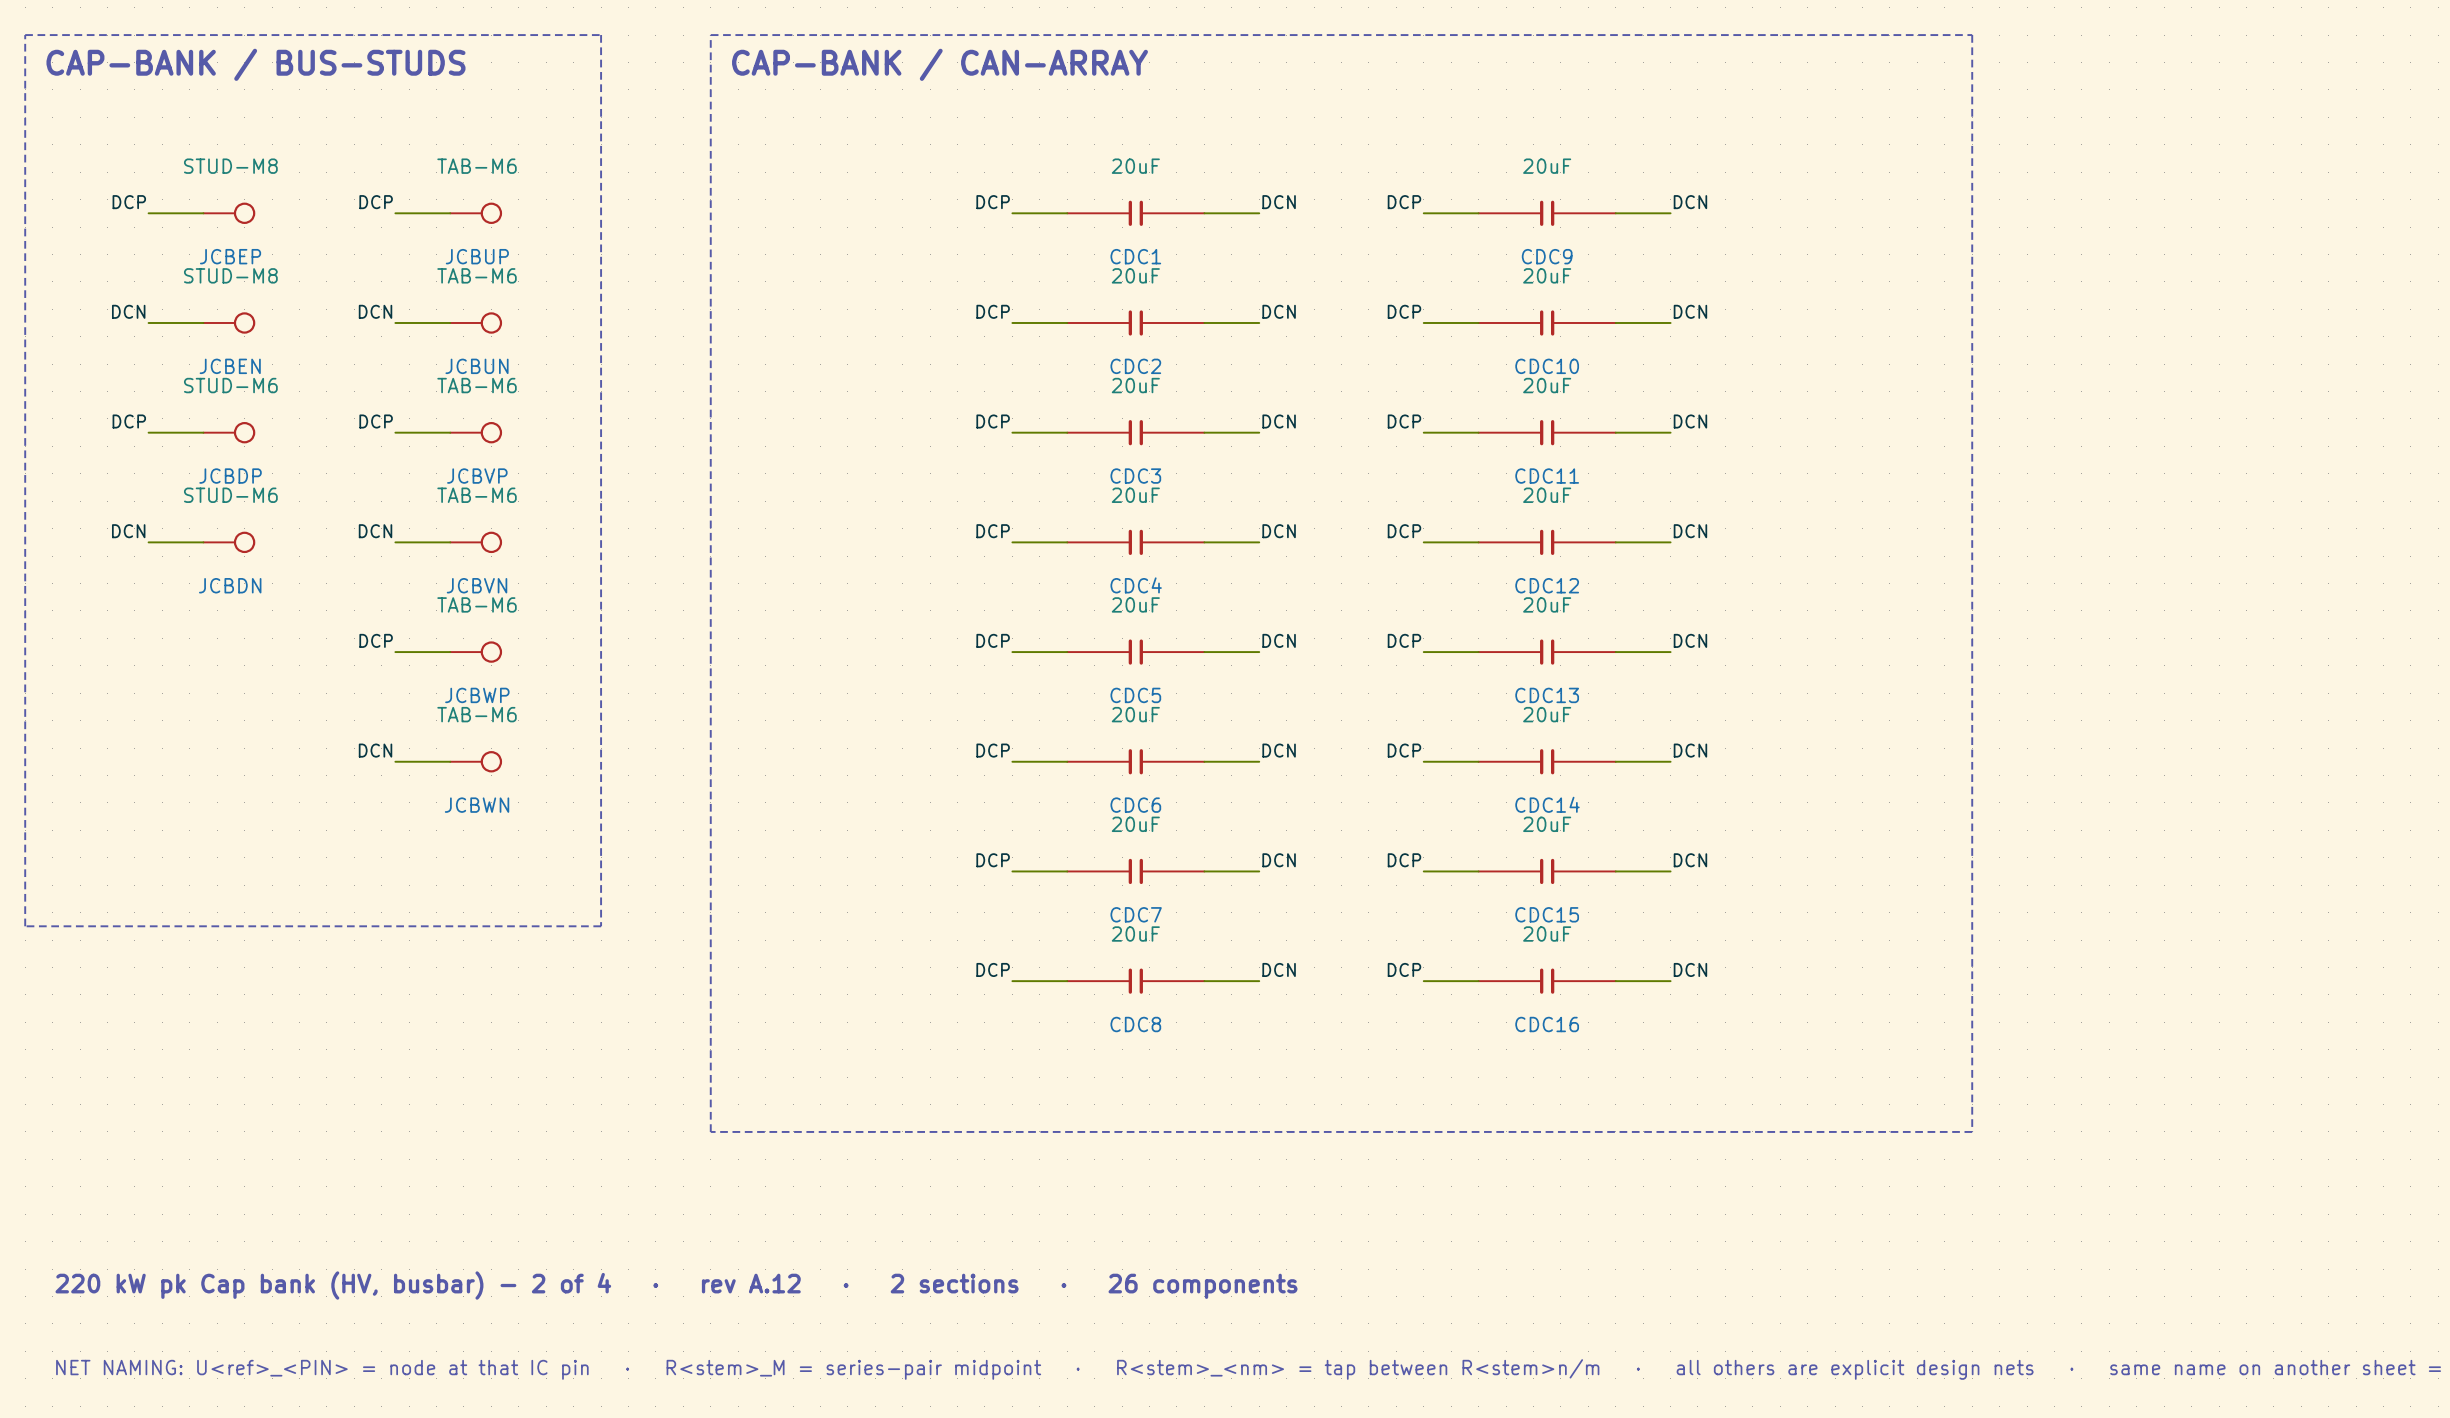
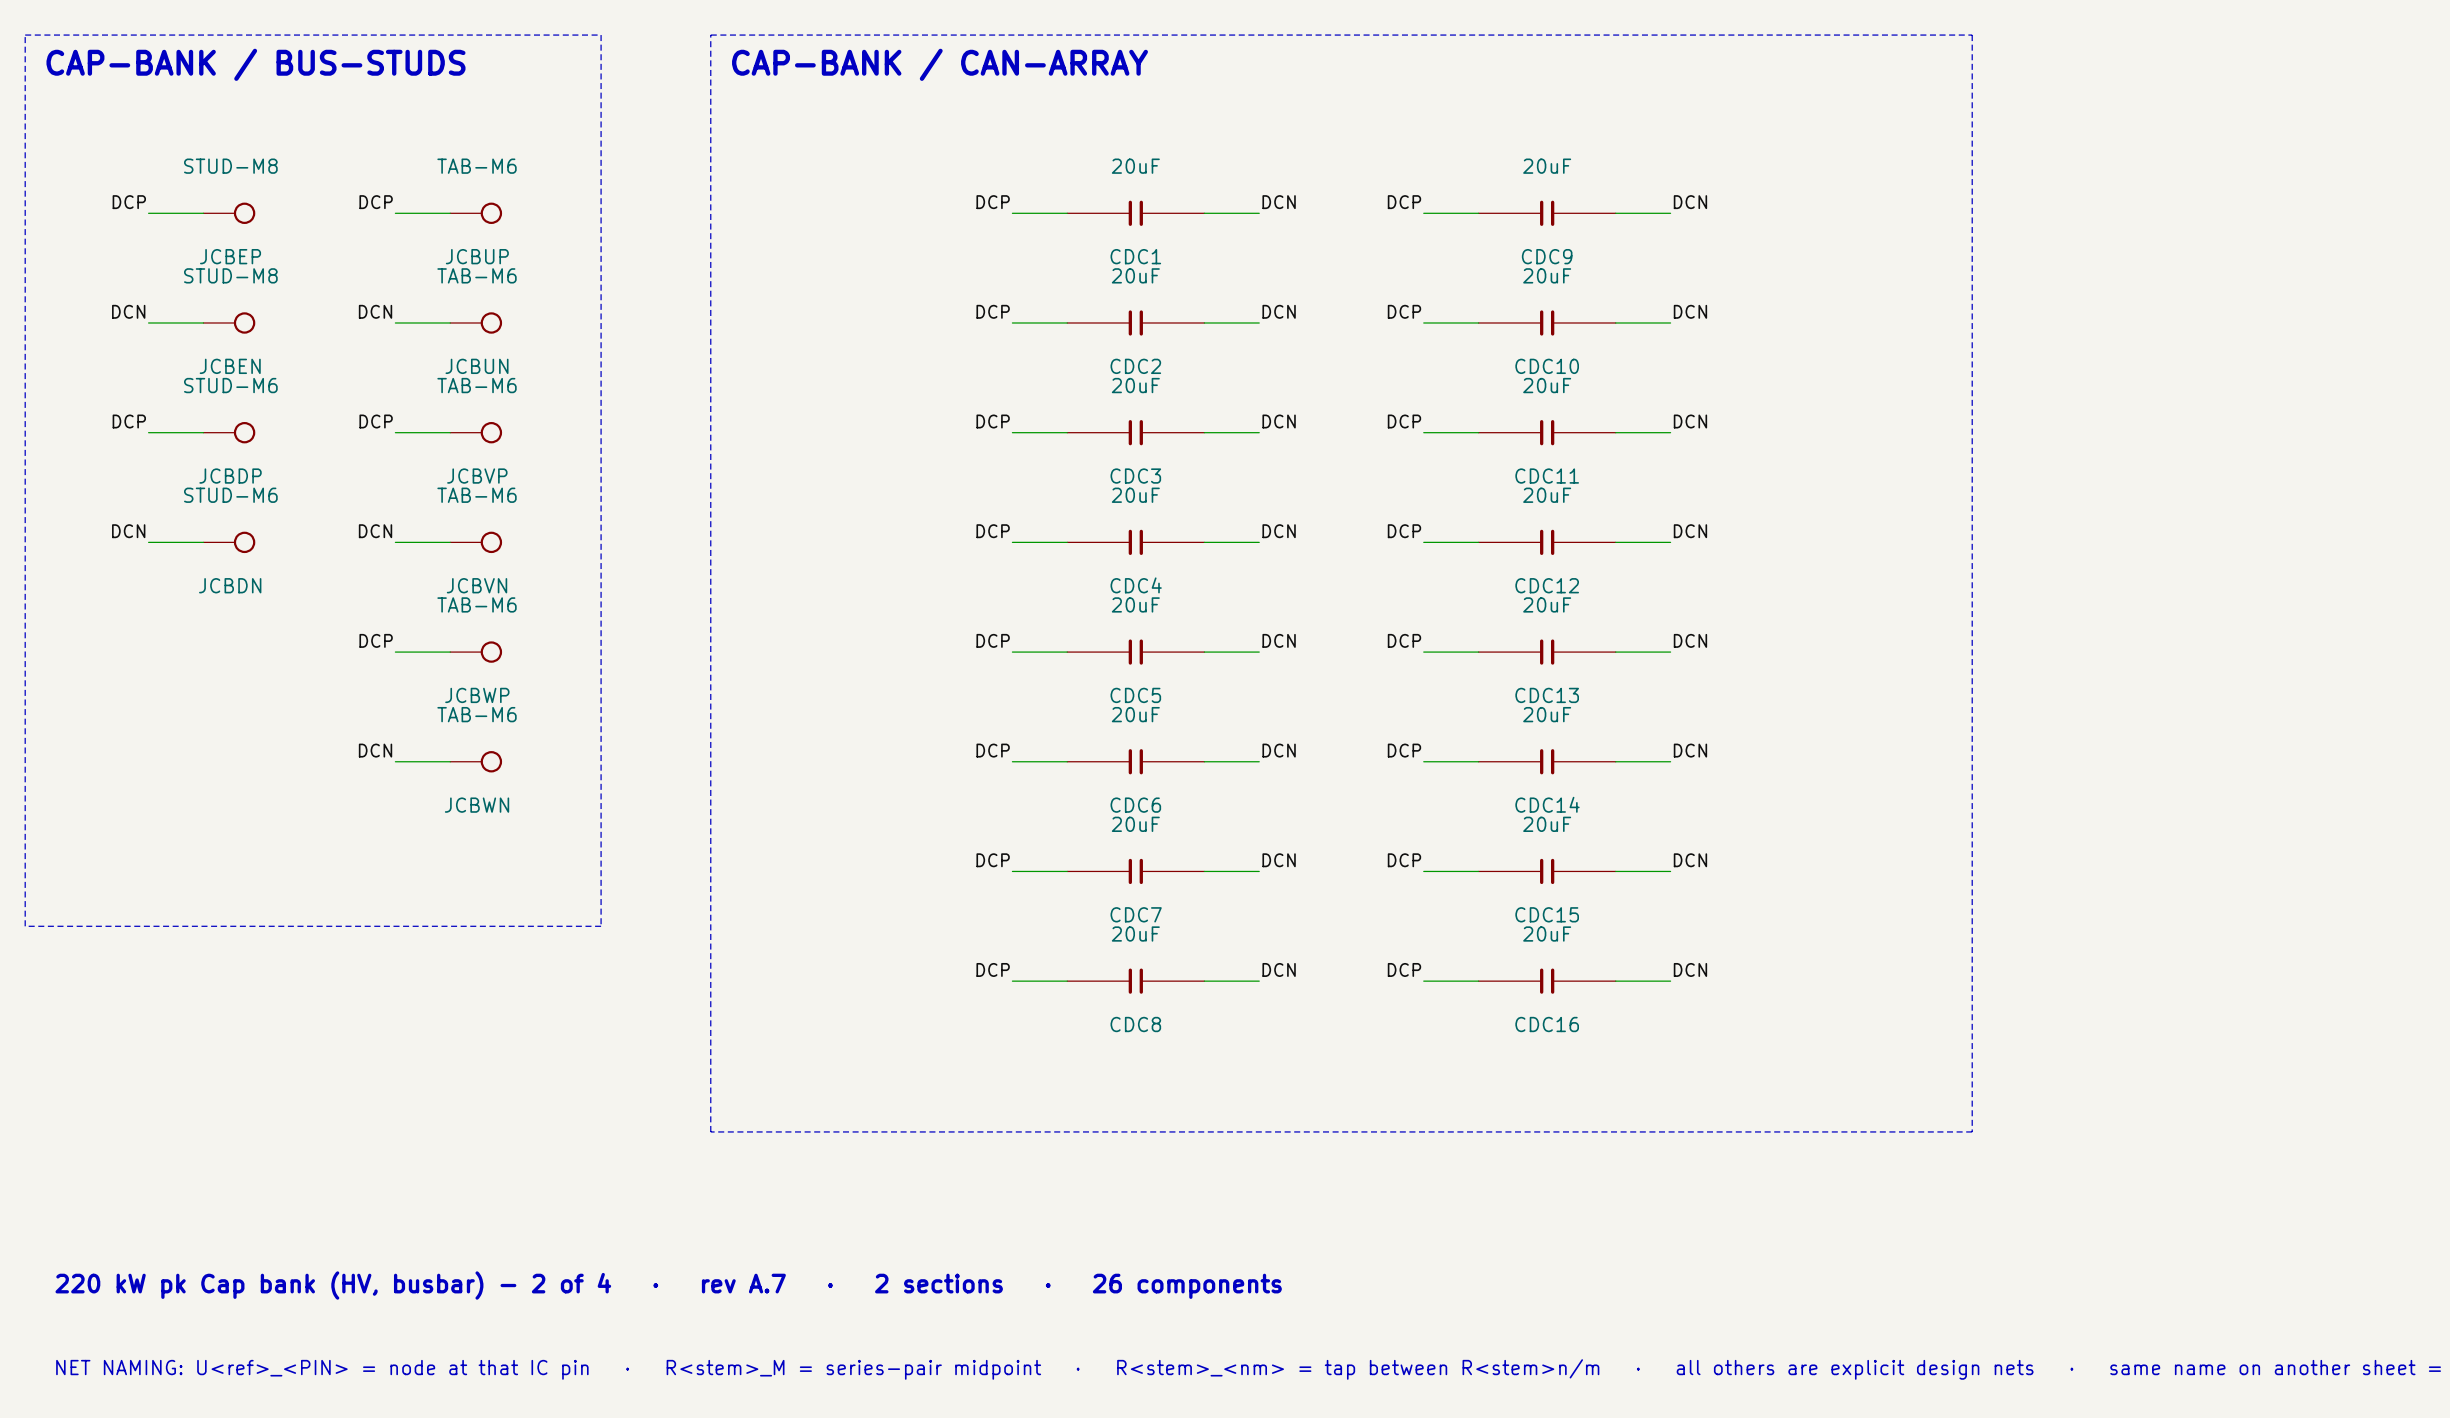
text: 220 kW pk Cap bank (HV, busbar) - 2 of 4 · rev A.12 · 2 sections · 26 components (676, 1285) -> 220 kW pk Cap bank (HV, busbar) - 2 of 4 · rev A.7 · 2 sections · 26 components (668, 1285)

